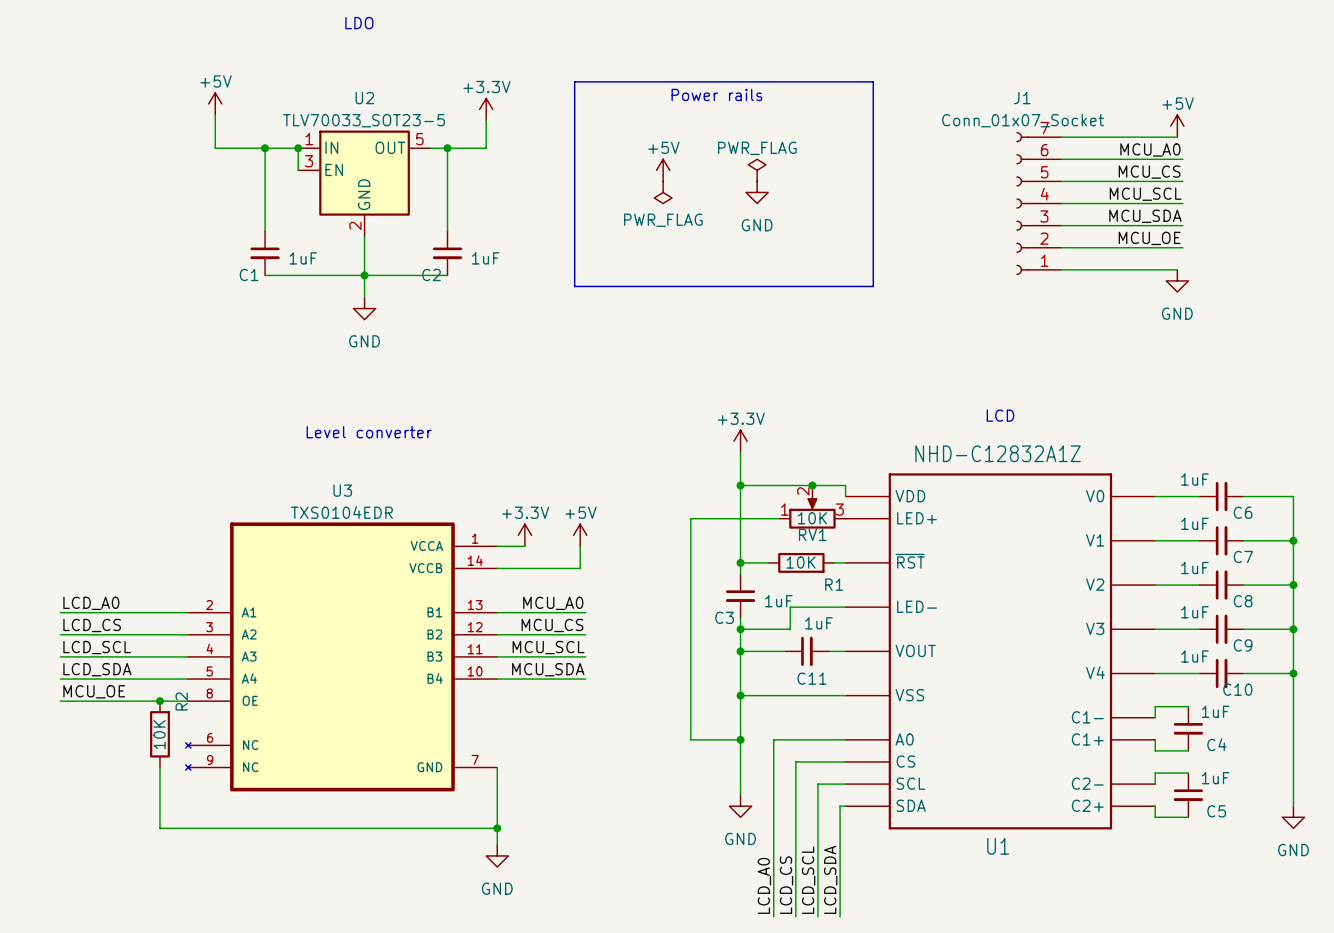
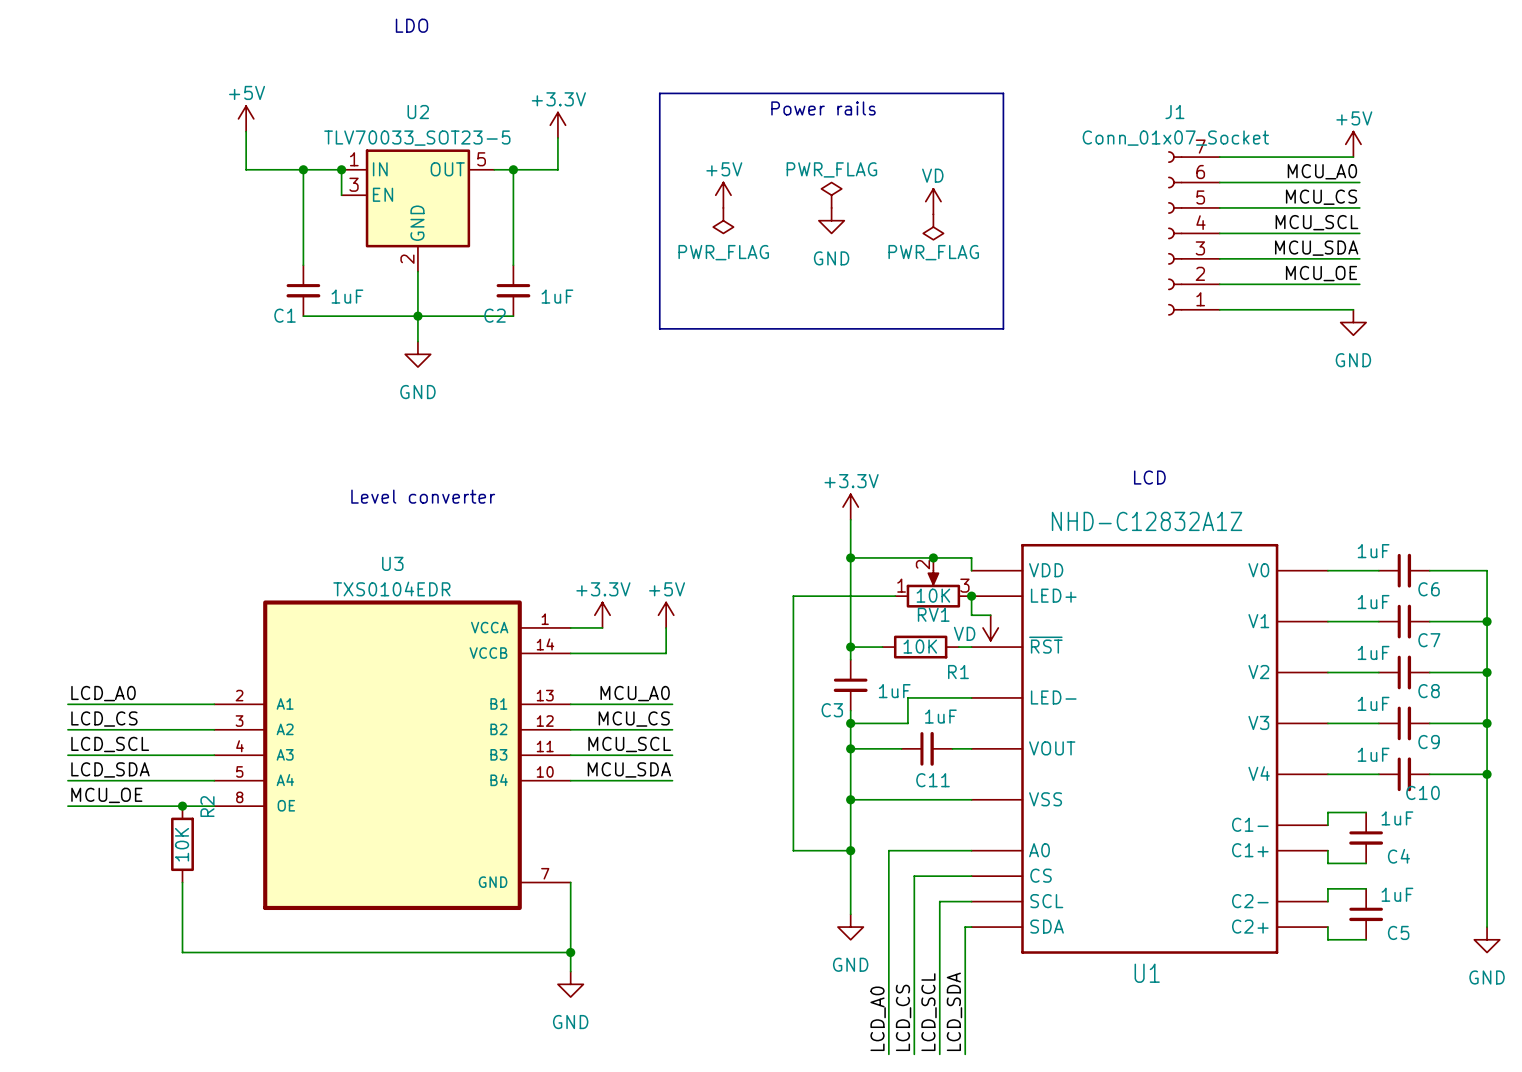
power symbol position: +5V (663, 170) -> +5V (723, 195)
power symbol: none -> PWR_FLAG (831, 195)
power symbol: PWR_FLAG (757, 170) -> none
power symbol: none -> VD (933, 201)
power symbol: none -> PWR_FLAG (723, 220)
power symbol: PWR_FLAG (663, 192) -> none
power symbol position: GND (757, 192) -> GND (831, 220)
power symbol: none -> PWR_FLAG (933, 227)
wire: none -> (971, 596) (971, 615) (990, 615)
junction: none -> (971, 596)
U3 symbol: [185, 522, 498, 792] -> [214, 600, 571, 911]
power symbol: none -> VD (990, 627)

